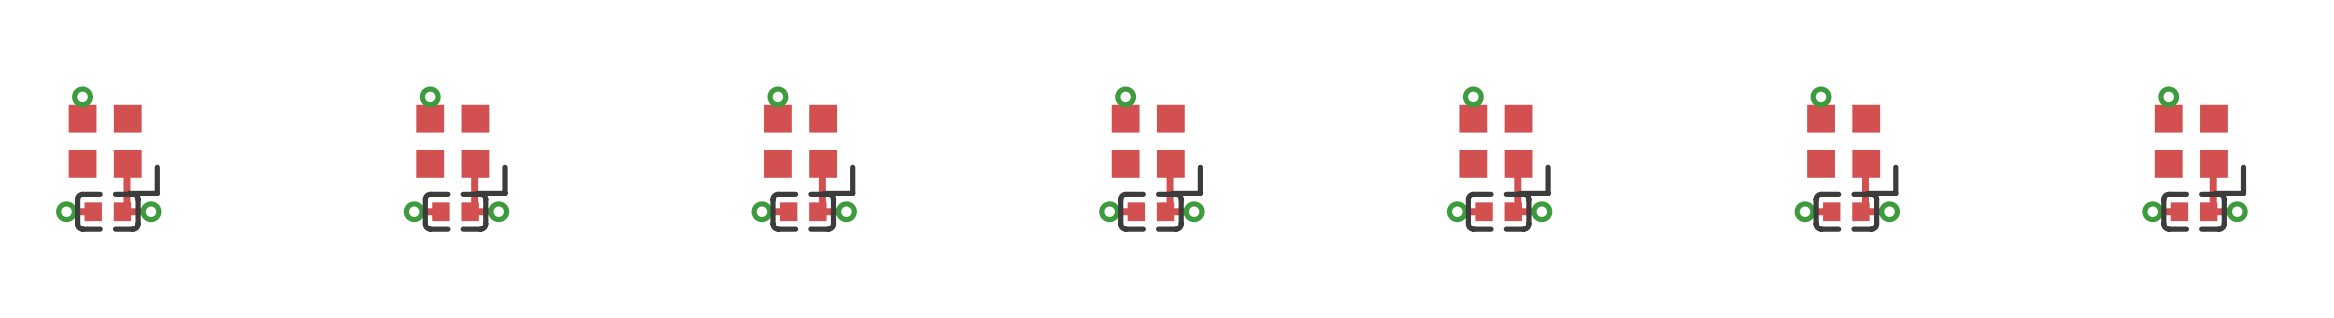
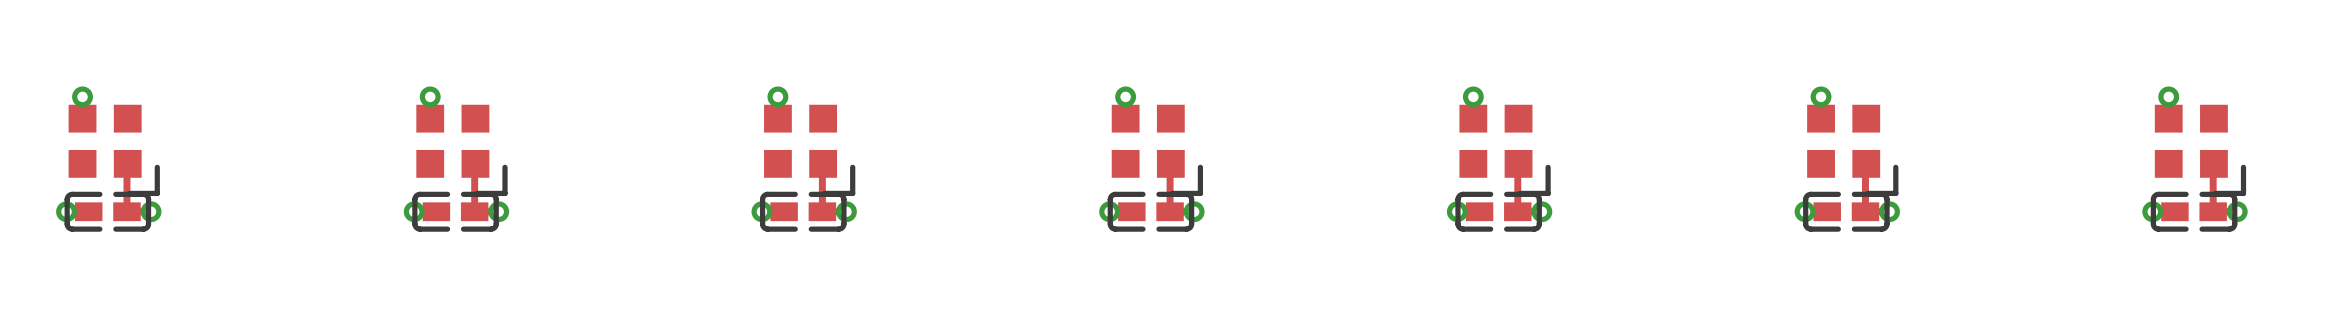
part footprint: [74, 191, 141, 232] -> [64, 191, 152, 232]
part footprint: [422, 191, 489, 232] -> [412, 191, 499, 232]
part footprint: [770, 191, 837, 232] -> [759, 191, 847, 232]
part footprint: [1118, 191, 1184, 232] -> [1107, 191, 1195, 232]
part footprint: [1465, 191, 1532, 232] -> [1455, 191, 1542, 232]
part footprint: [1813, 191, 1880, 232] -> [1803, 191, 1890, 232]
part footprint: [2161, 191, 2227, 232] -> [2150, 191, 2238, 232]

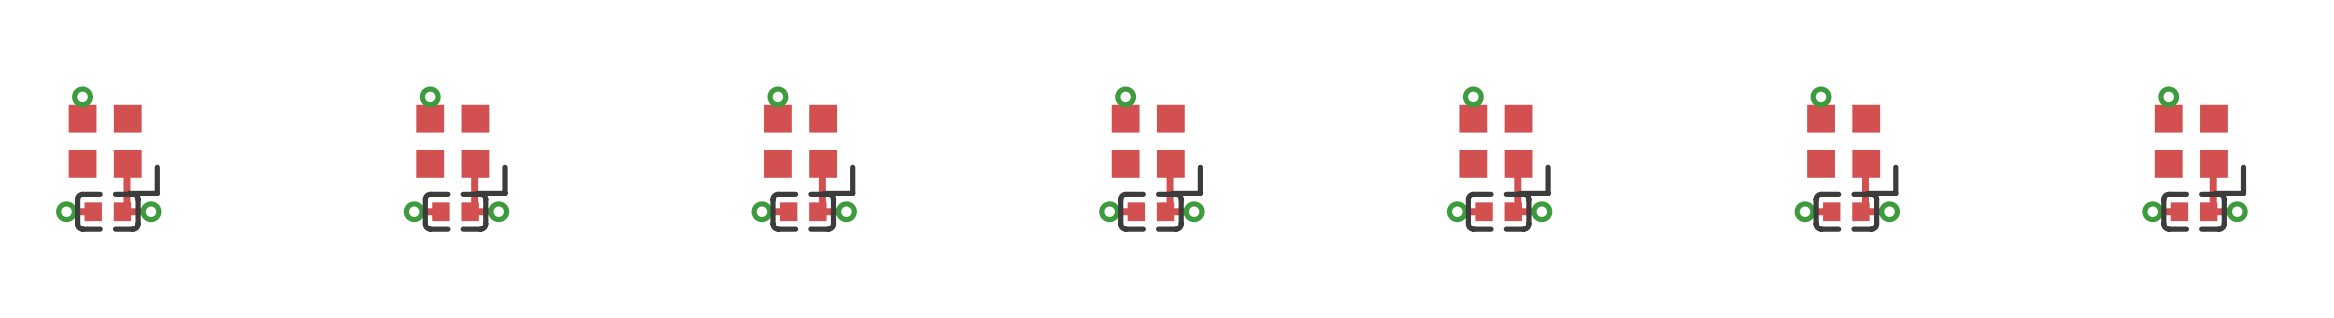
part footprint: [64, 191, 152, 232] -> [74, 191, 141, 232]
part footprint: [412, 191, 499, 232] -> [422, 191, 489, 232]
part footprint: [759, 191, 847, 232] -> [770, 191, 837, 232]
part footprint: [1107, 191, 1195, 232] -> [1118, 191, 1184, 232]
part footprint: [1455, 191, 1542, 232] -> [1465, 191, 1532, 232]
part footprint: [1803, 191, 1890, 232] -> [1813, 191, 1880, 232]
part footprint: [2150, 191, 2238, 232] -> [2161, 191, 2227, 232]

